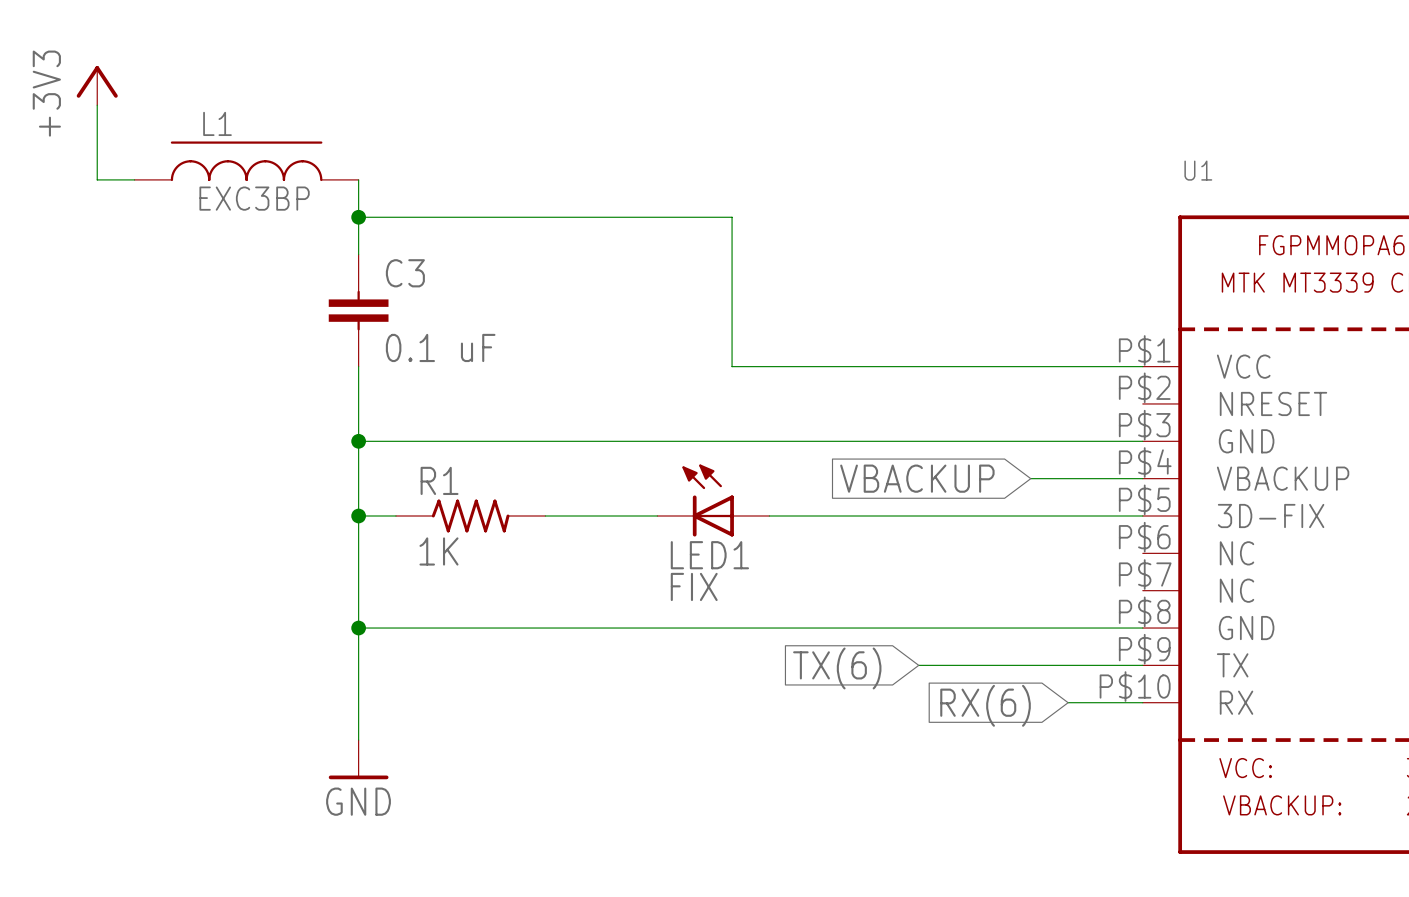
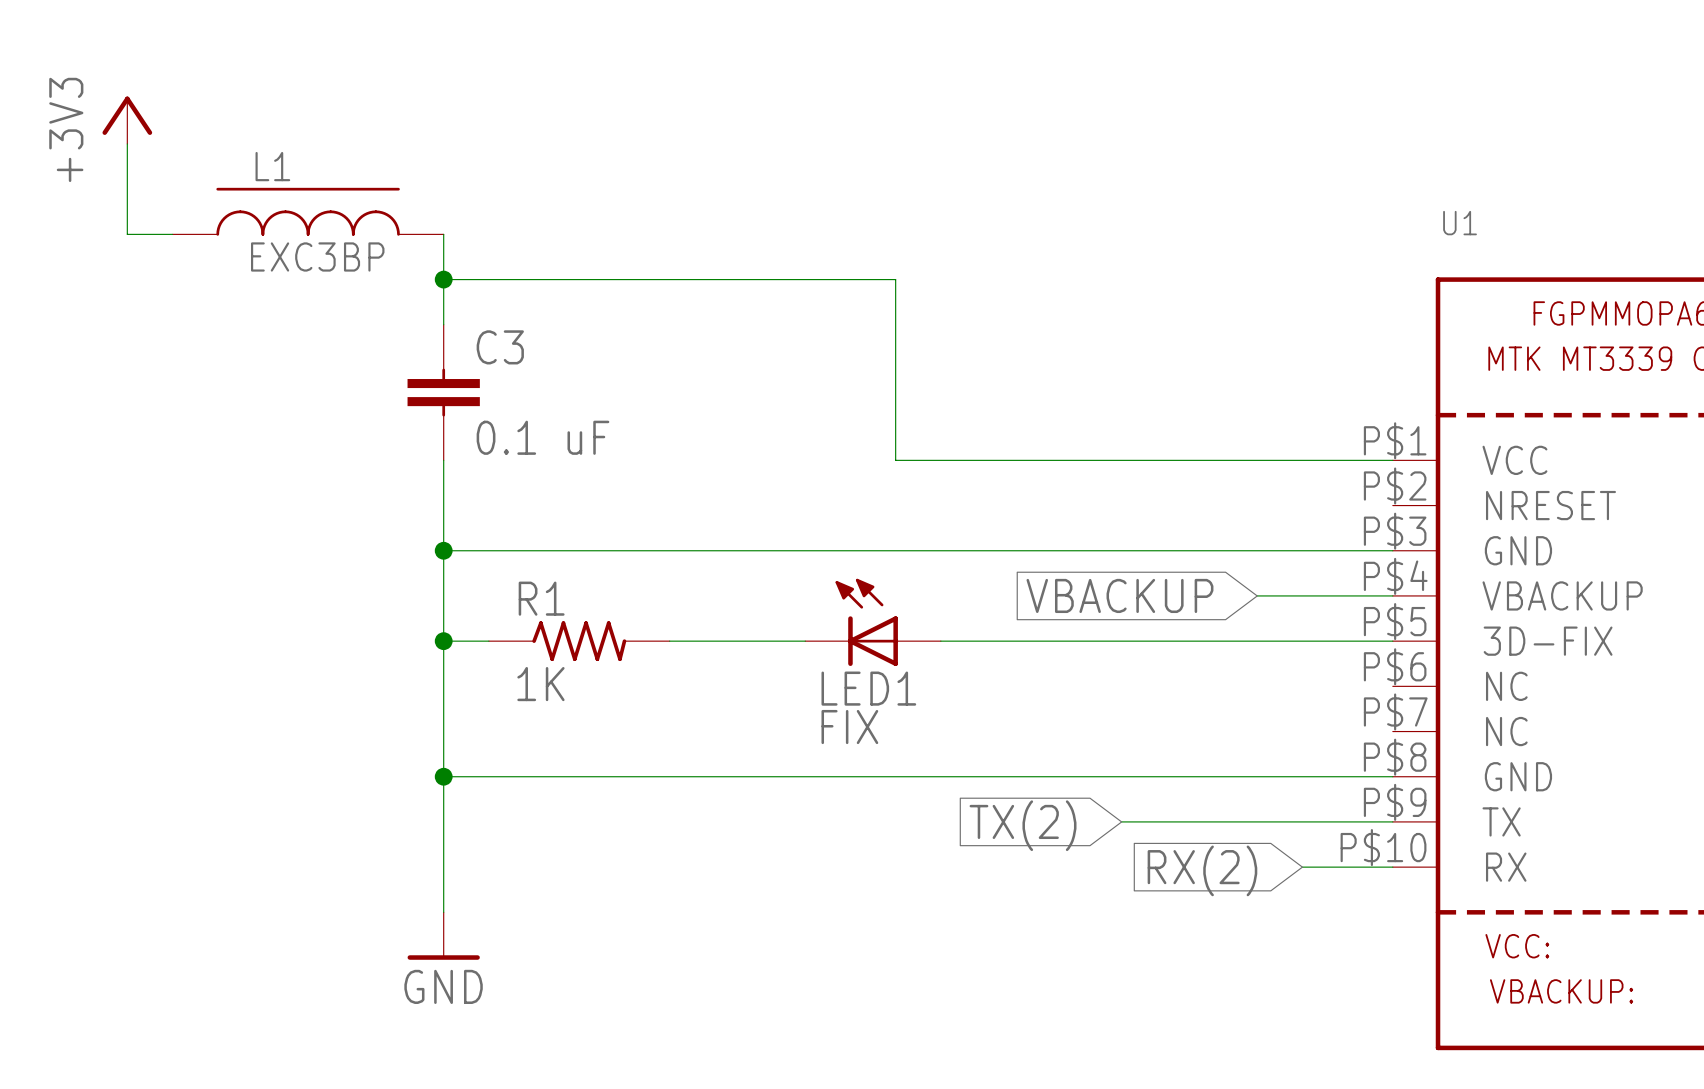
global label: TX(6) (837, 668) -> TX(2) (1023, 825)
global label: RX(6) (985, 705) -> RX(2) (1202, 870)

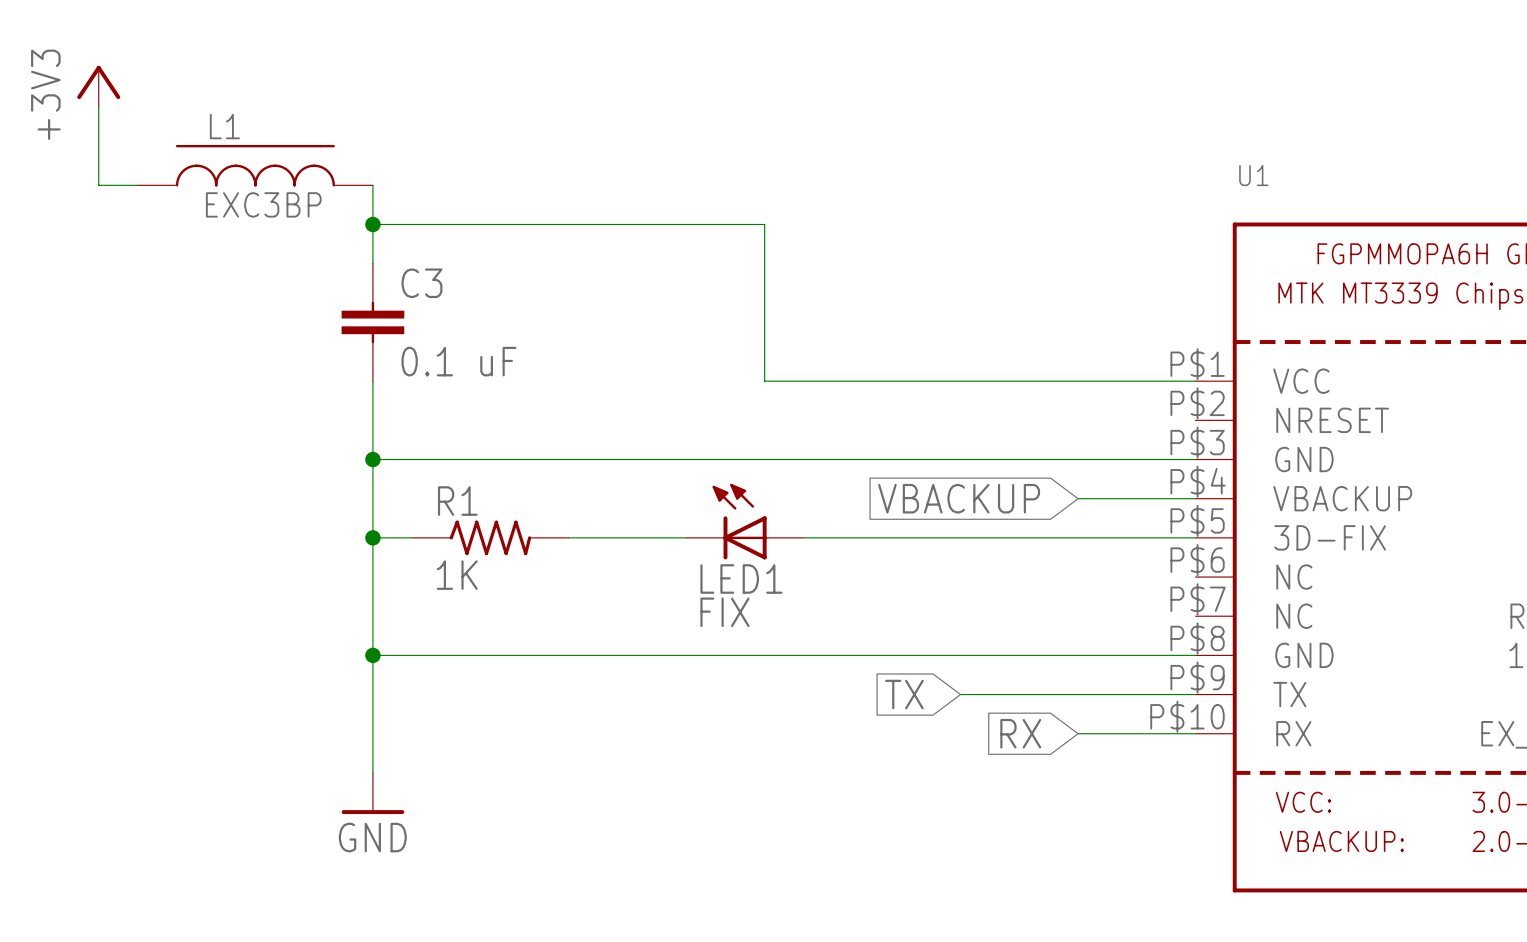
global label: TX(2) (1023, 825) -> TX (904, 694)
global label: none -> RX (1020, 733)
wire: none -> (1078, 733) (1117, 733)
global label: RX(2) (1202, 870) -> none

